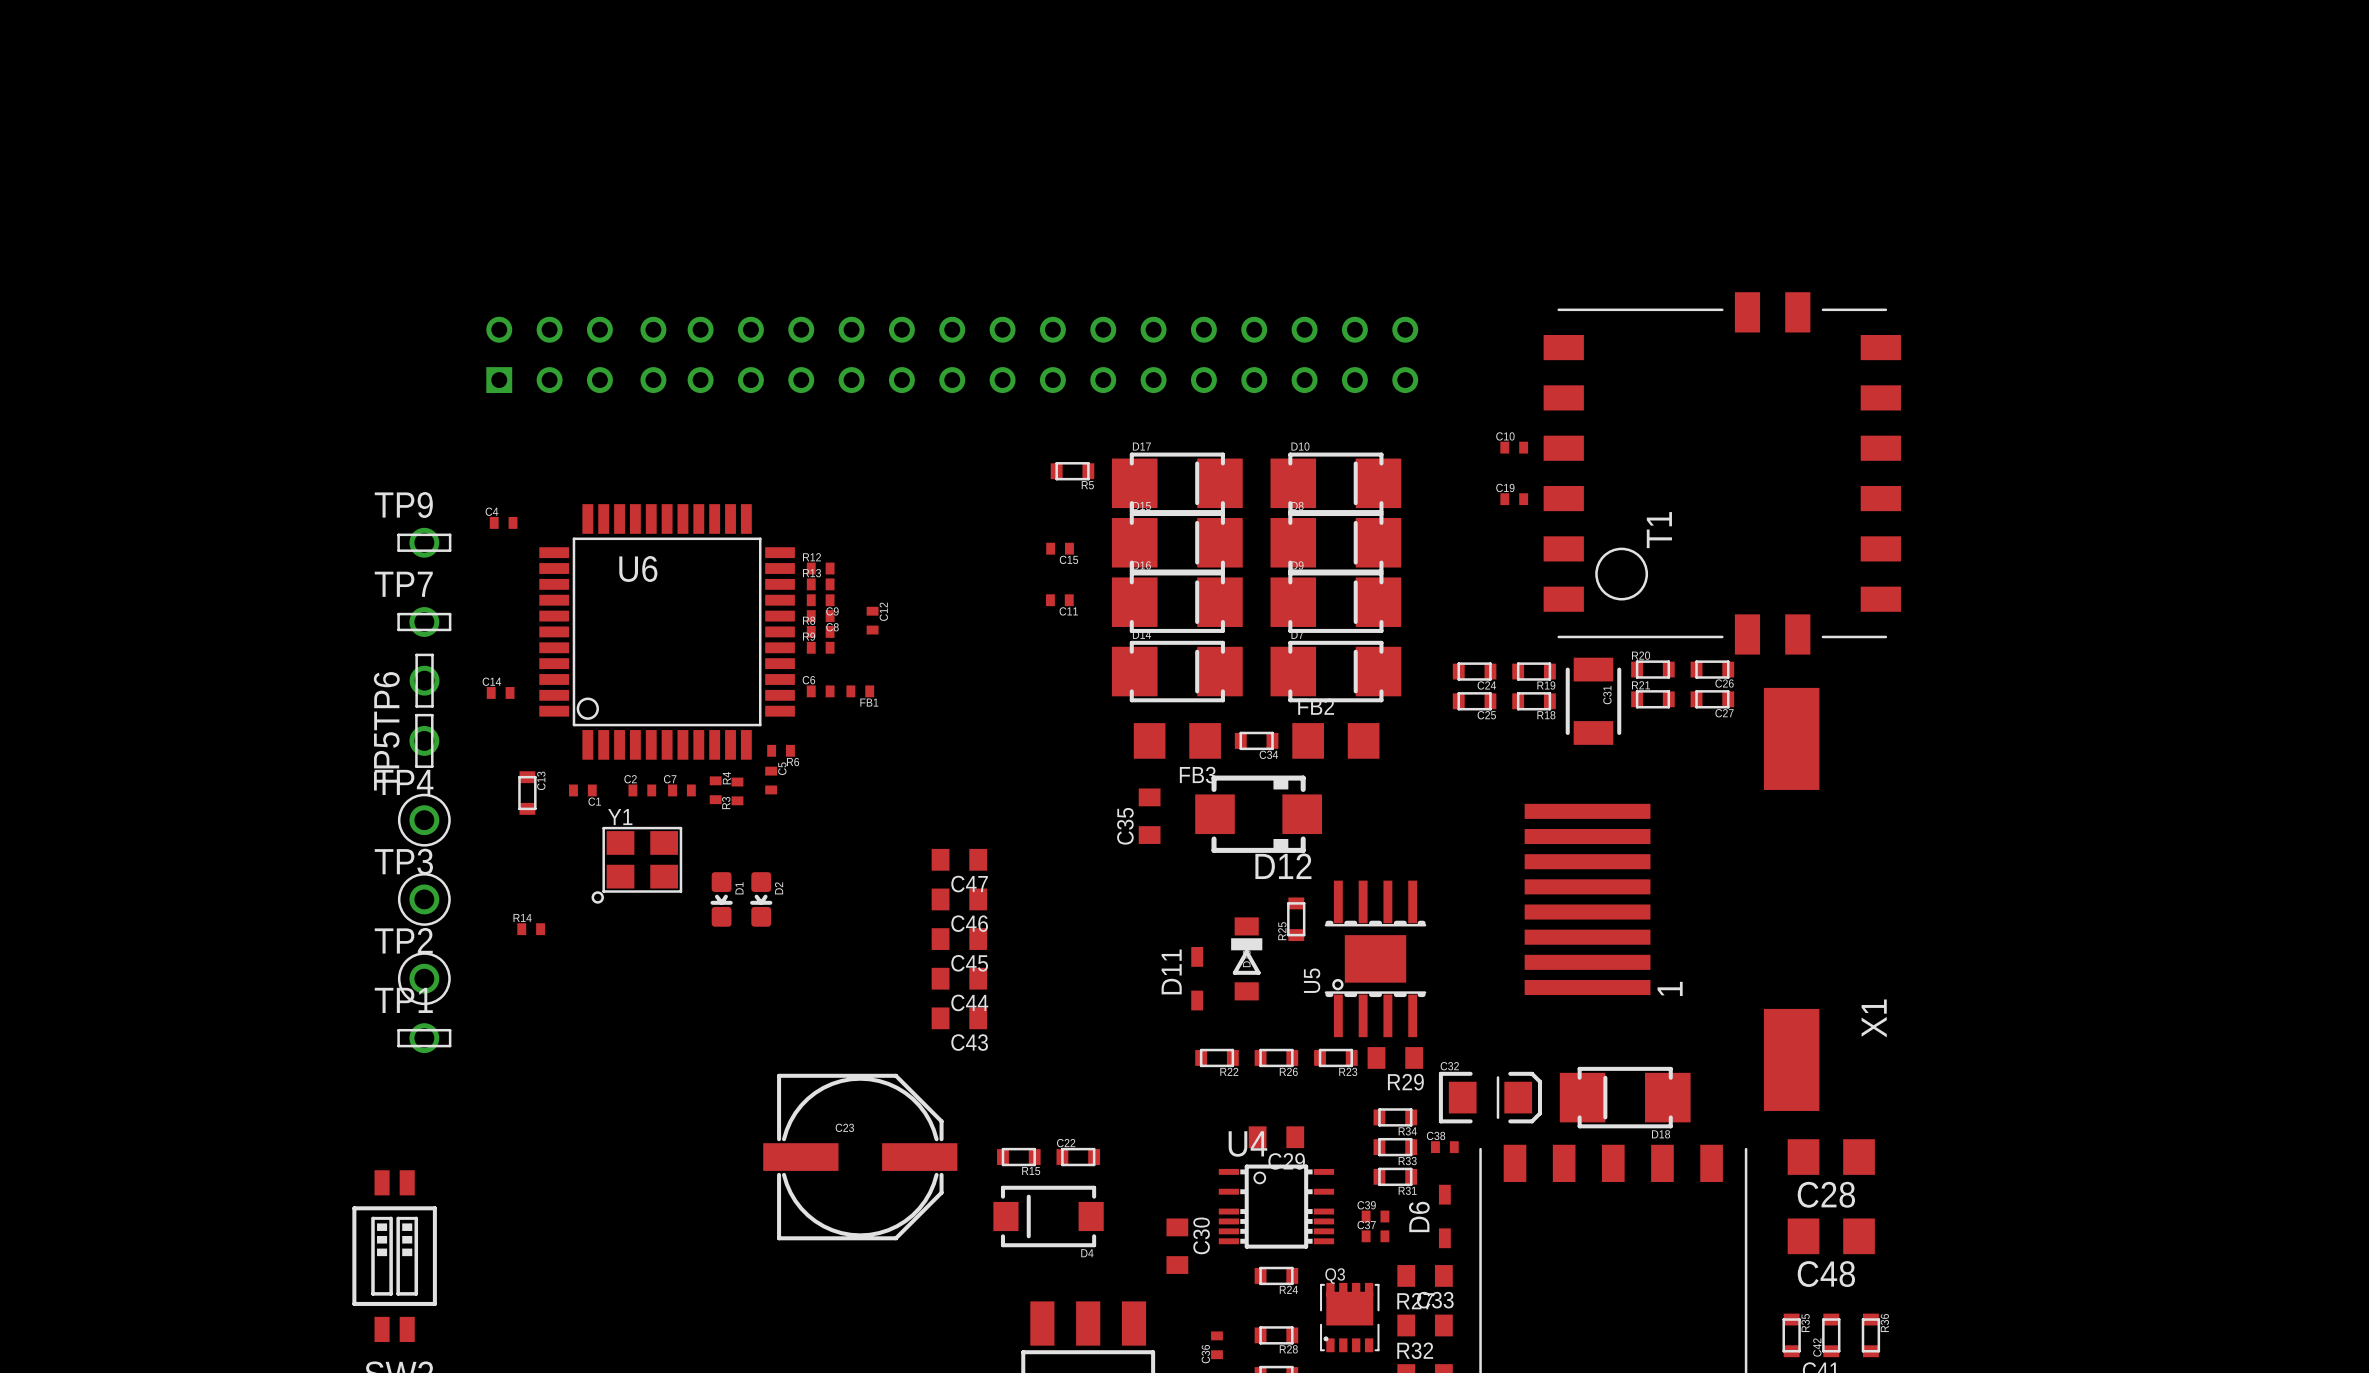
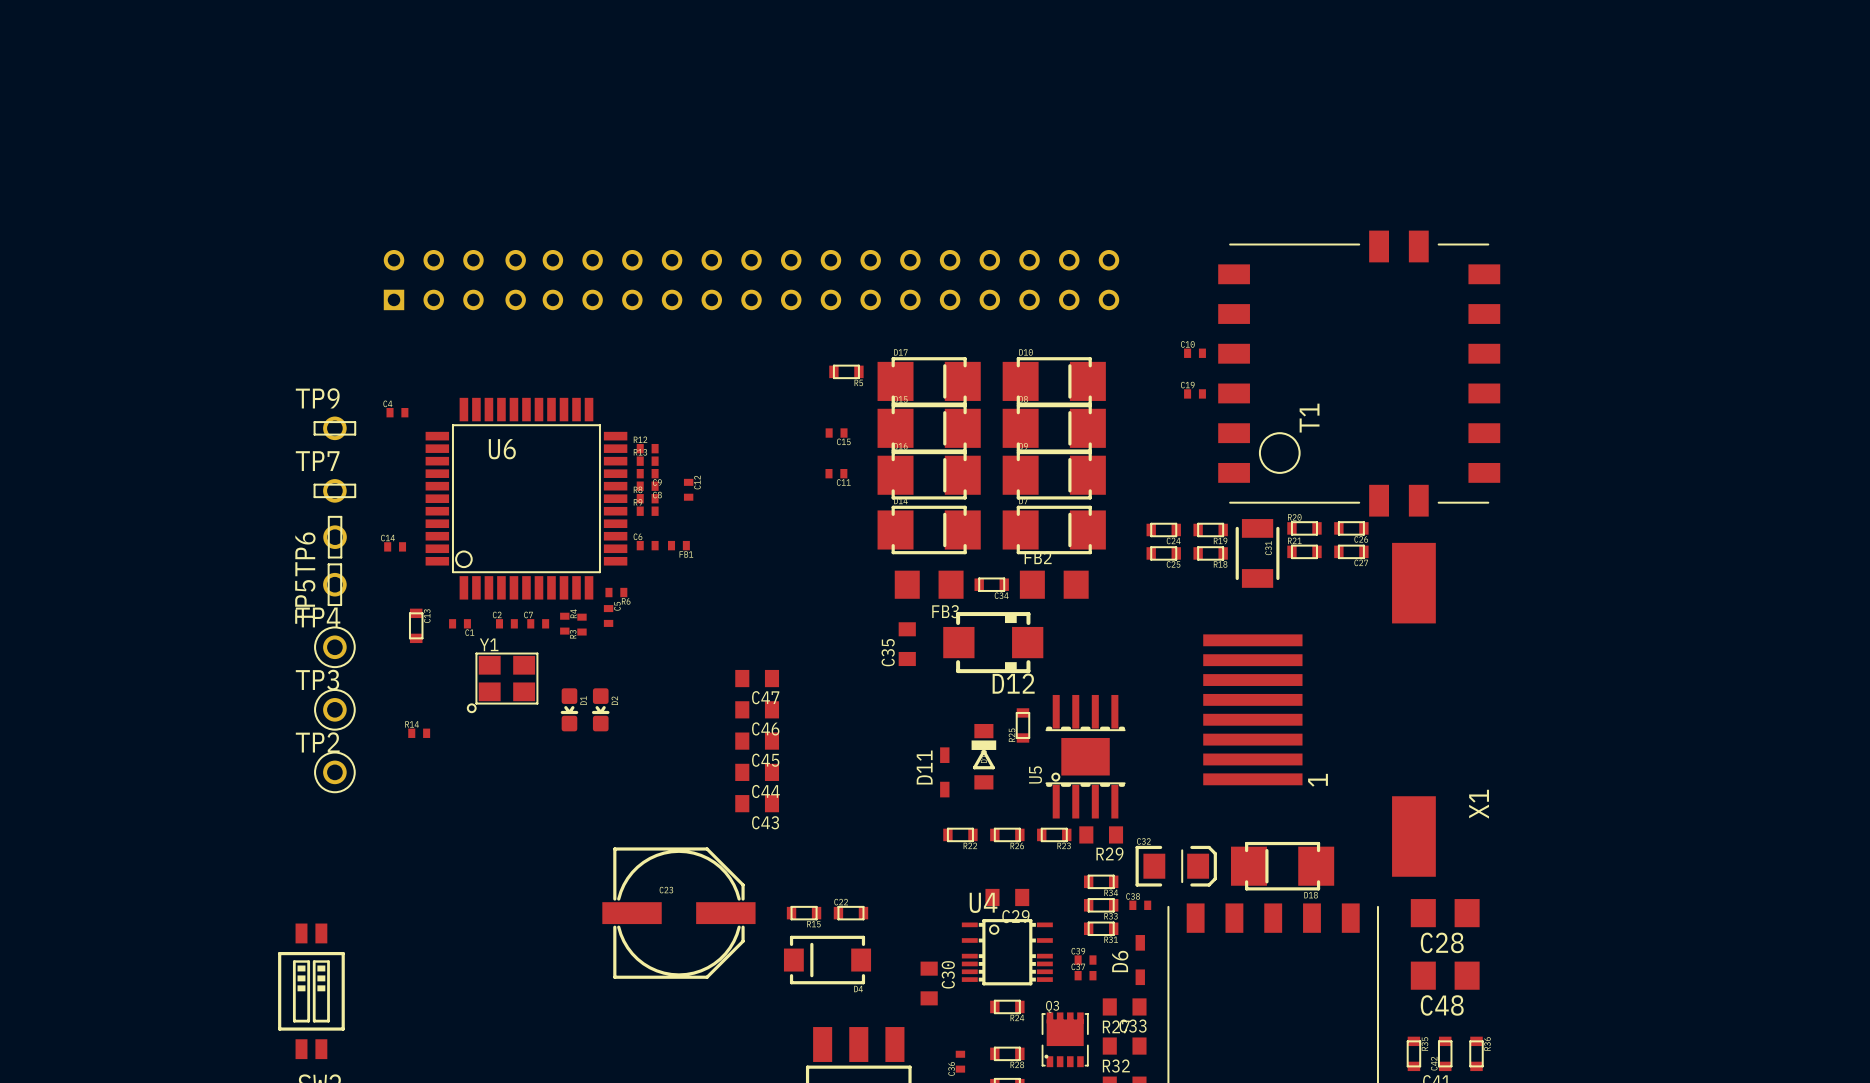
TP1: (424, 1038) -> none

